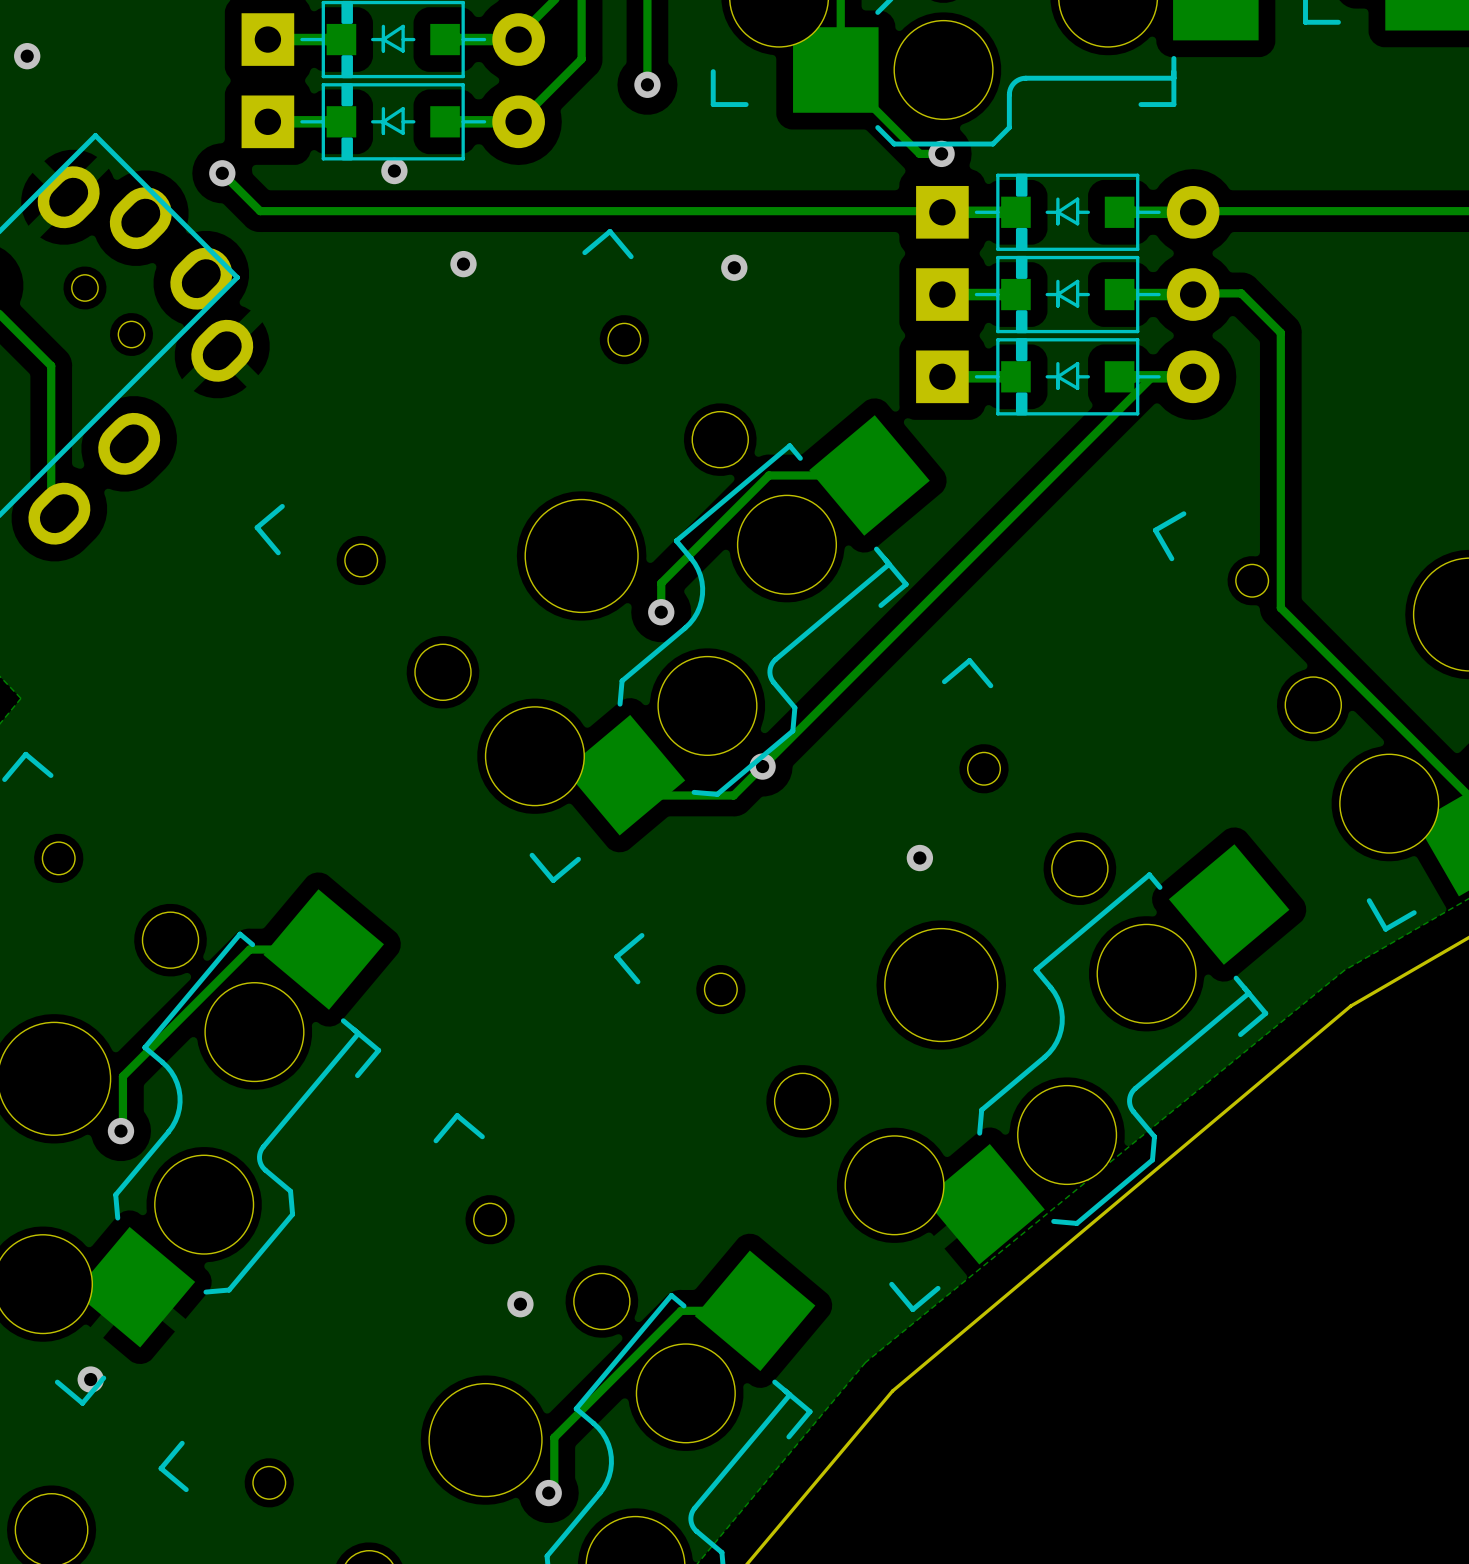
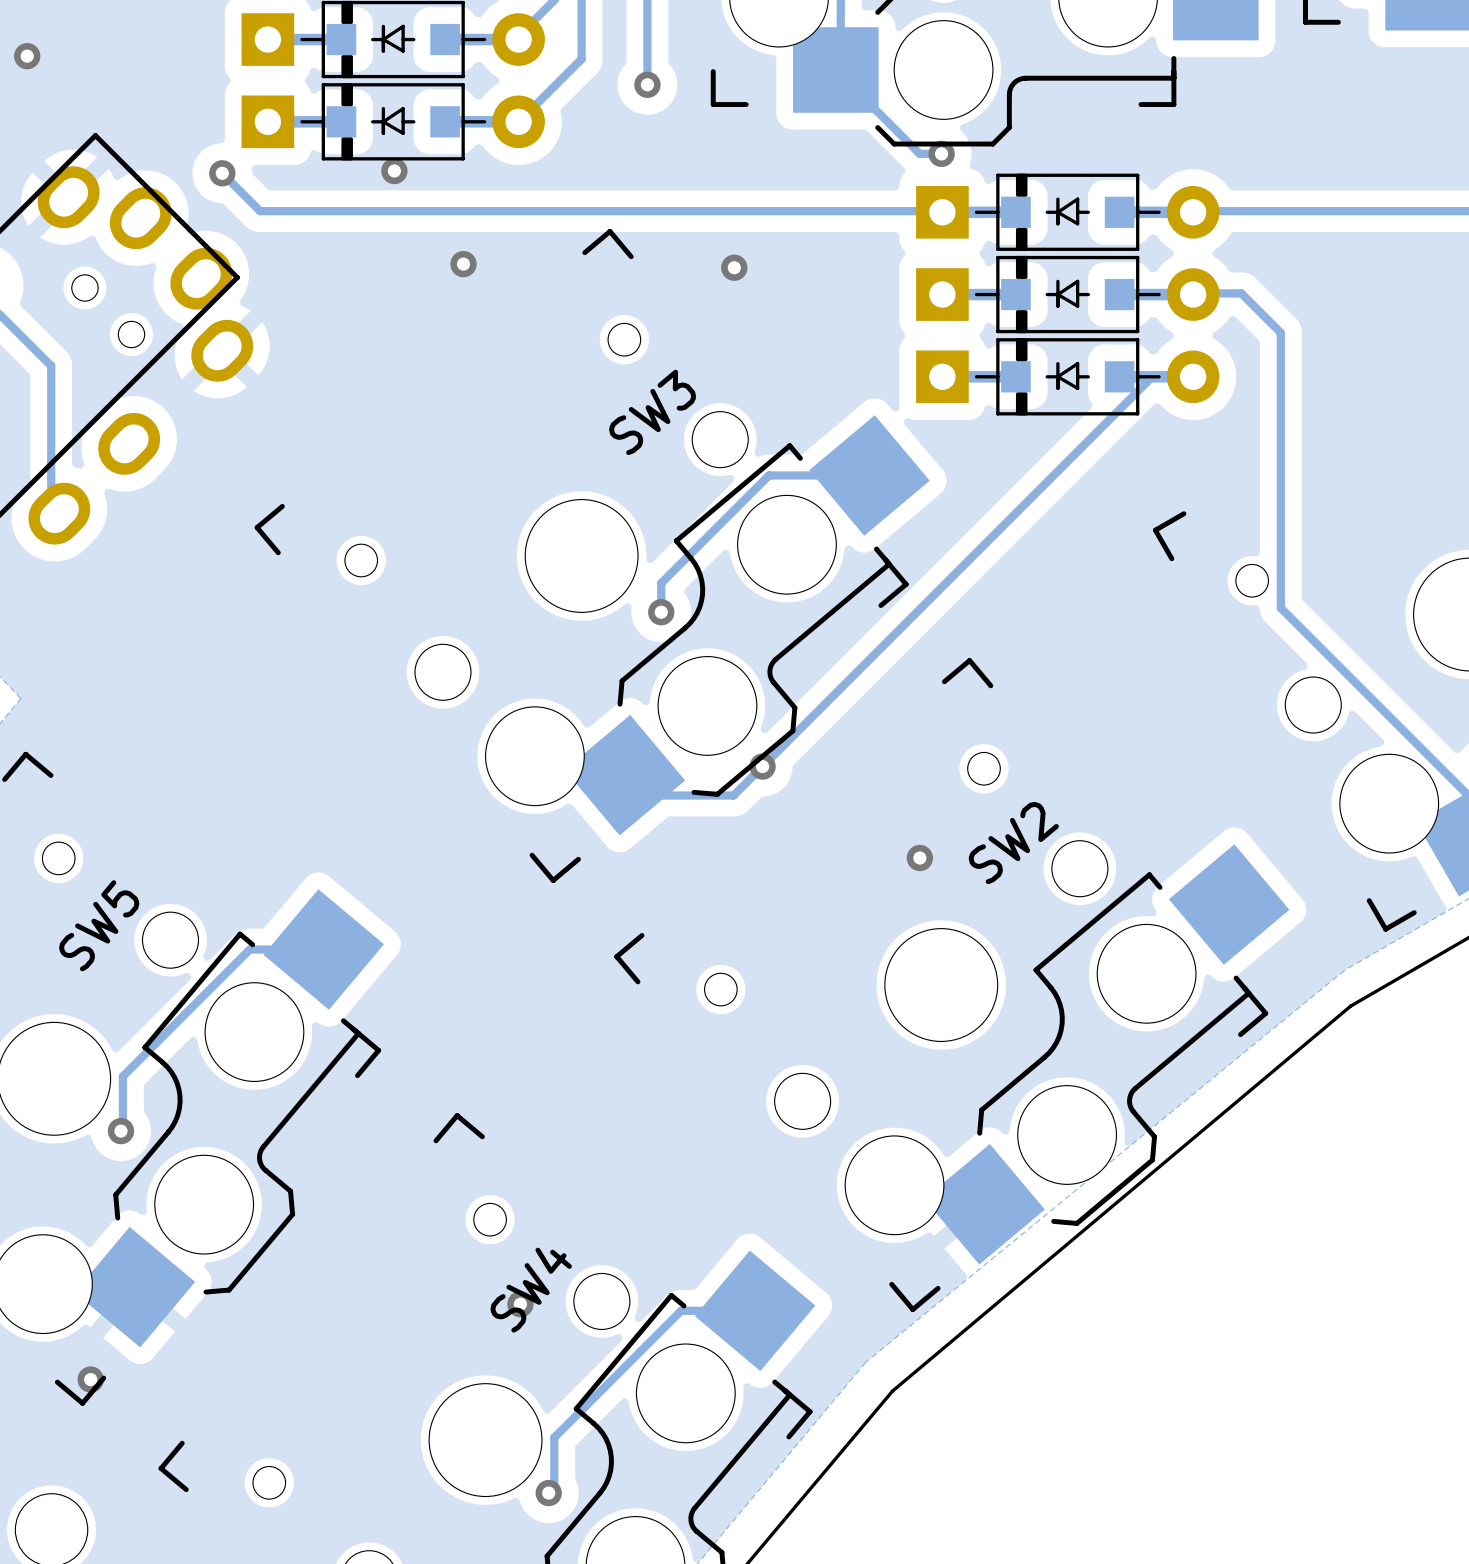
SW3 name: none -> SW3 (652, 412)
SW2 name: none -> SW2 (1013, 843)
SW5 name: none -> SW5 (99, 925)
SW4 name: none -> SW4 (531, 1290)

